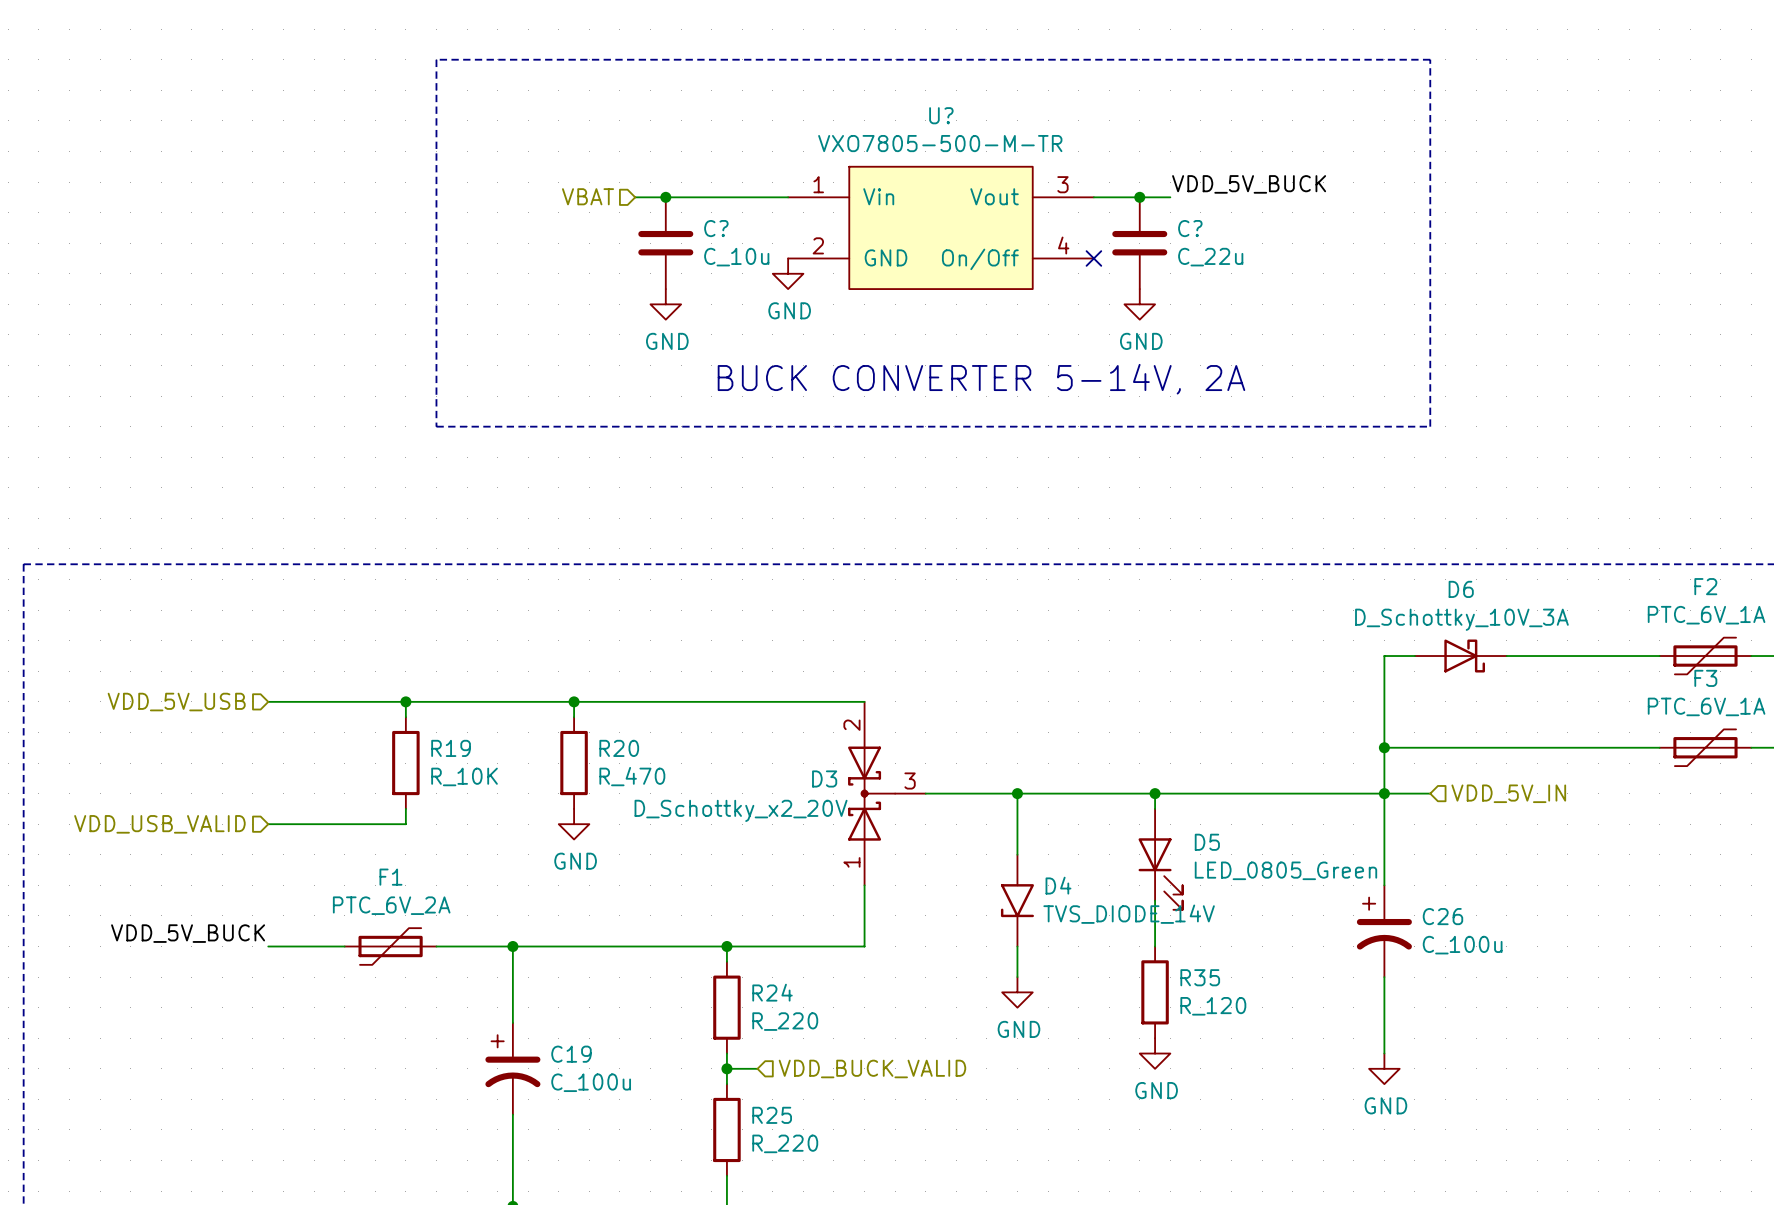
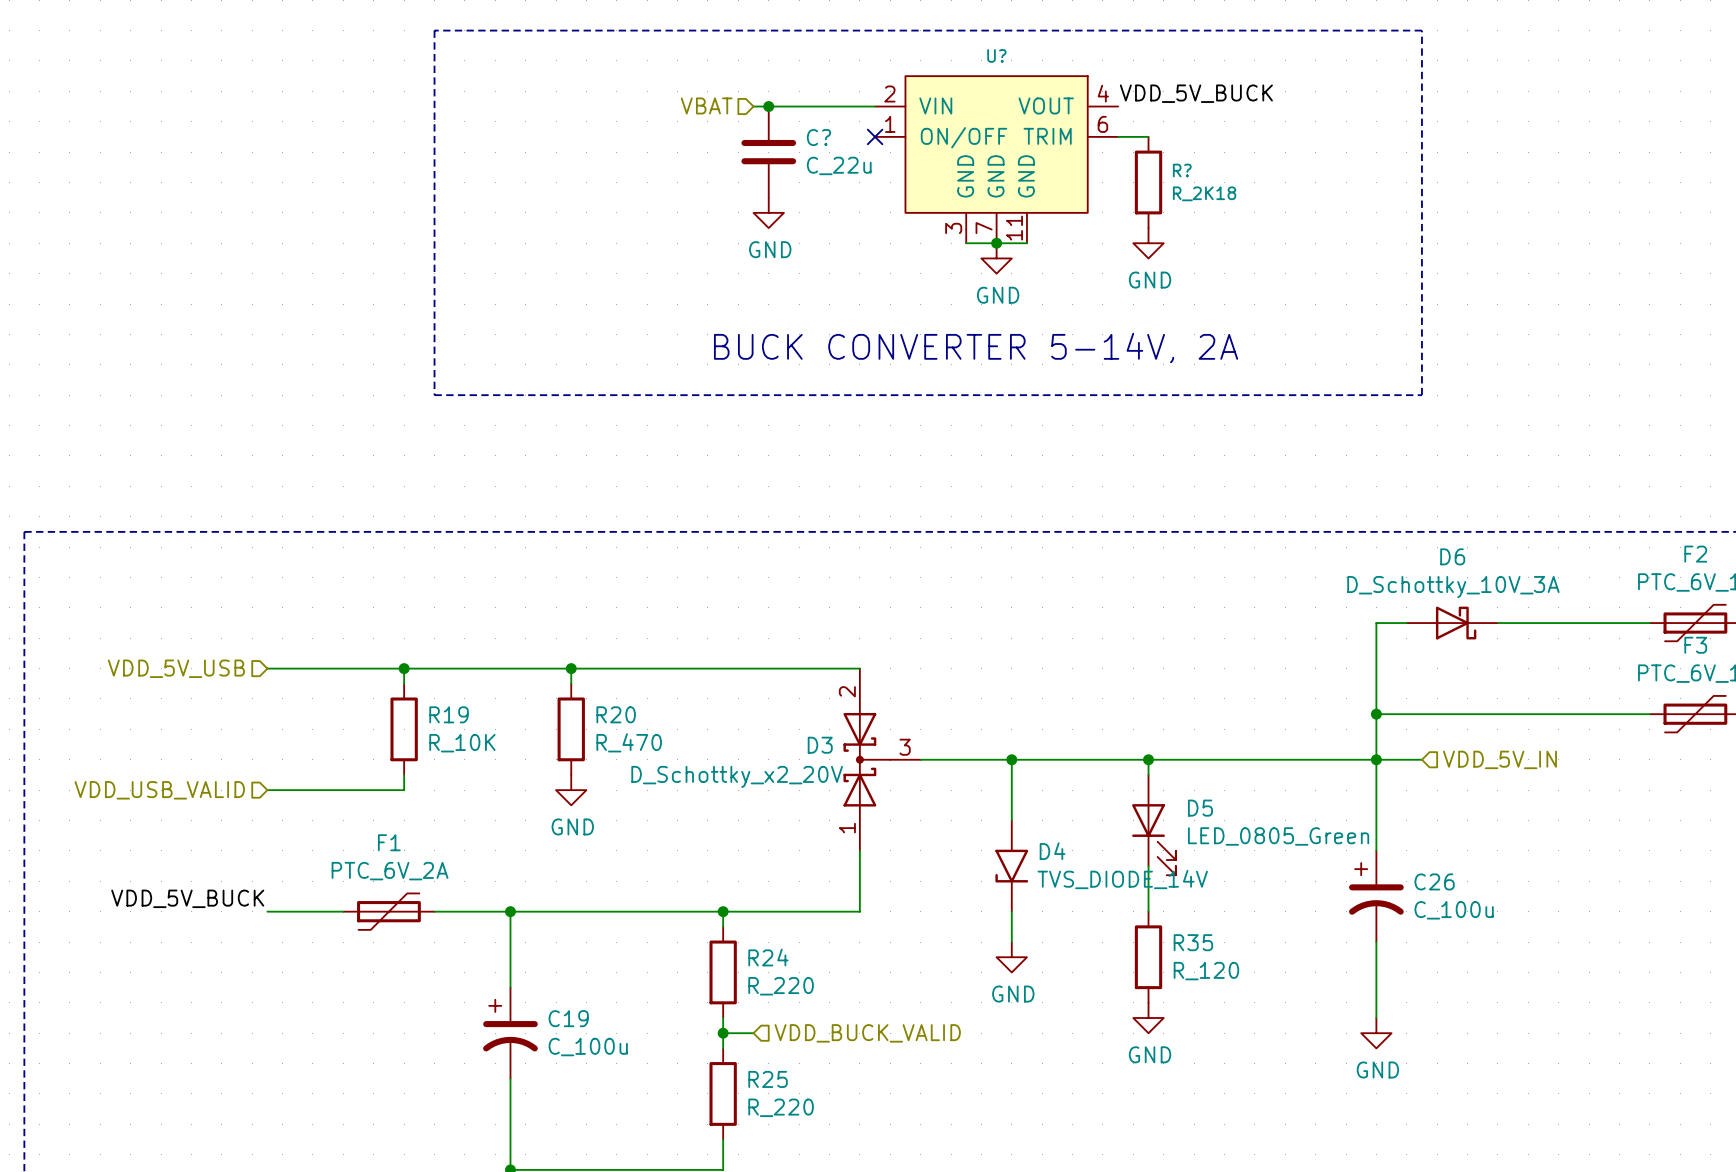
wire: none -> (753, 106) (875, 106)
junction: none -> (768, 106)
no-connect mark: none -> (875, 136)
wire: none -> (1118, 136) (1148, 136)
C?: none -> C_22u (768, 152)
label position: VDD_5V_BUCK (1249, 184) -> VDD_5V_BUCK (1196, 93)
U?: none -> (996, 159)
hierarchical label position: VBAT (588, 196) -> VBAT (706, 105)
wire: (635, 197) (788, 197) -> none
junction: (665, 197) -> none
wire: (1093, 197) (1170, 197) -> none
junction: (1139, 197) -> none
R?: none -> R_2K18 (1148, 182)
U?: VXO7805-500-M-TR (941, 227) -> none
C?: C_10u (665, 243) -> none
C?: C_22u (1139, 243) -> none
no-connect mark: (1093, 258) -> none
power symbol position: GND (788, 273) -> GND (768, 212)
junction: none -> (996, 243)
power symbol: none -> GND (996, 258)
power symbol: GND (665, 304) -> none
power symbol position: GND (1139, 304) -> GND (1148, 243)

